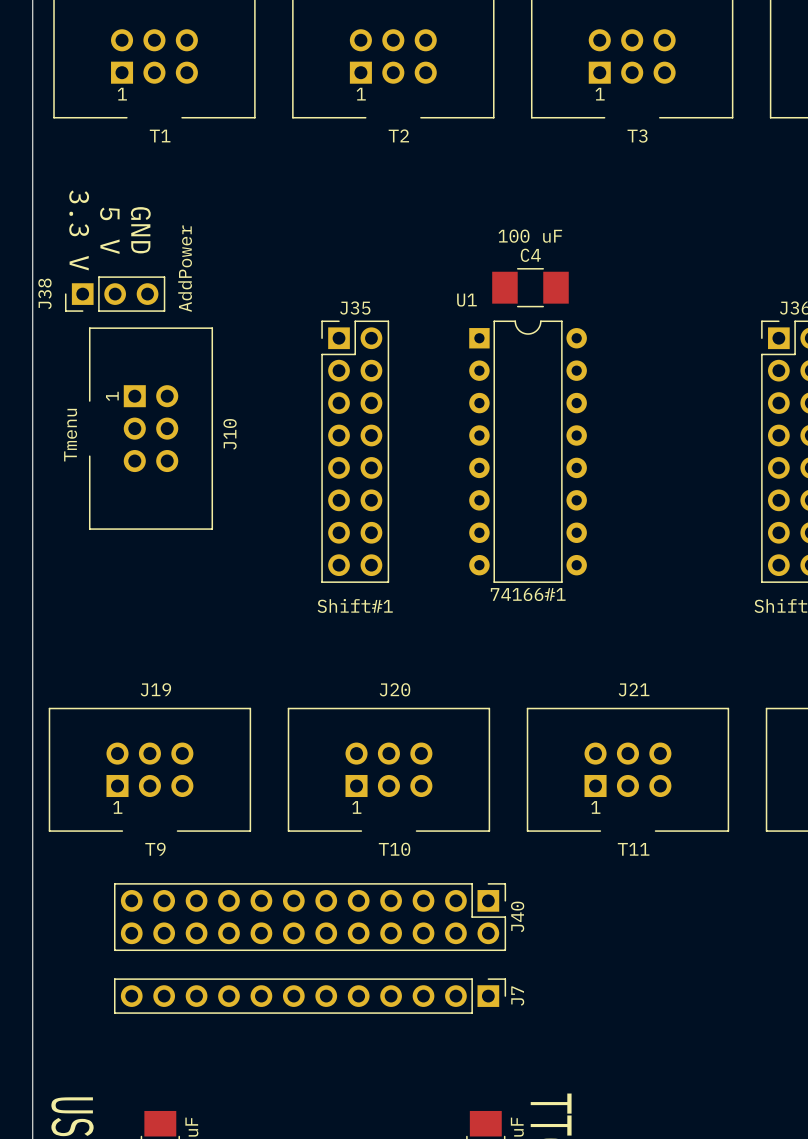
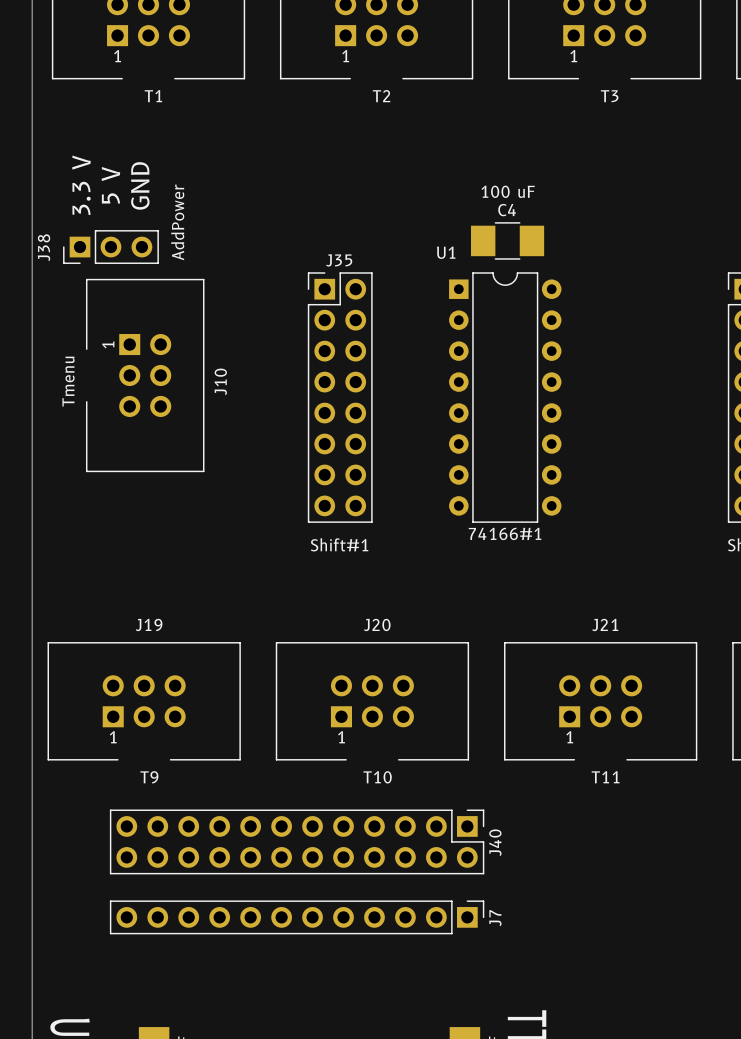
text rotation: 0° (79, 230) -> 180° (81, 185)
text rotation: 0° (109, 230) -> 180° (110, 185)
text rotation: 0° (140, 230) -> 180° (140, 185)

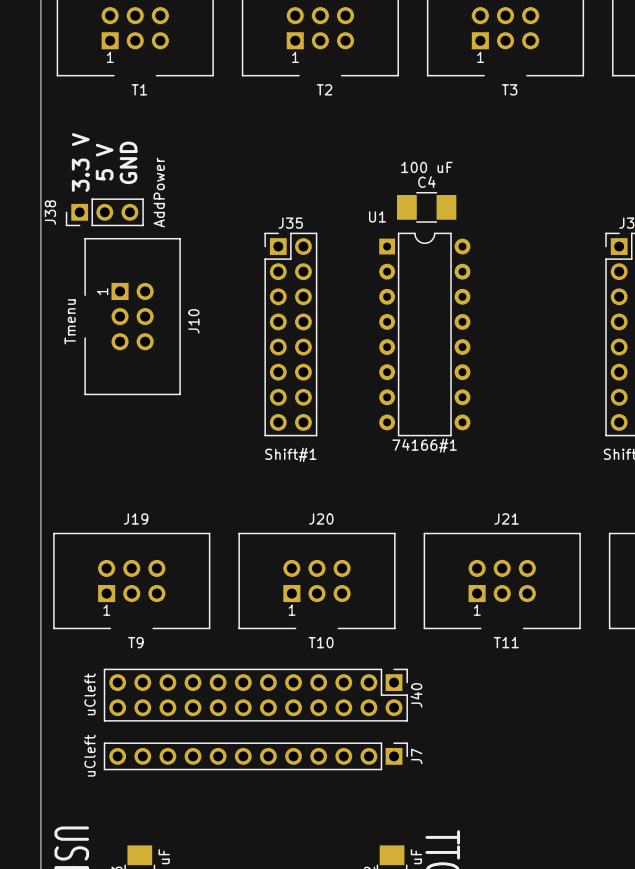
J40 value: none -> uCleft (89, 694)
J7 value: none -> uCleft (89, 755)

